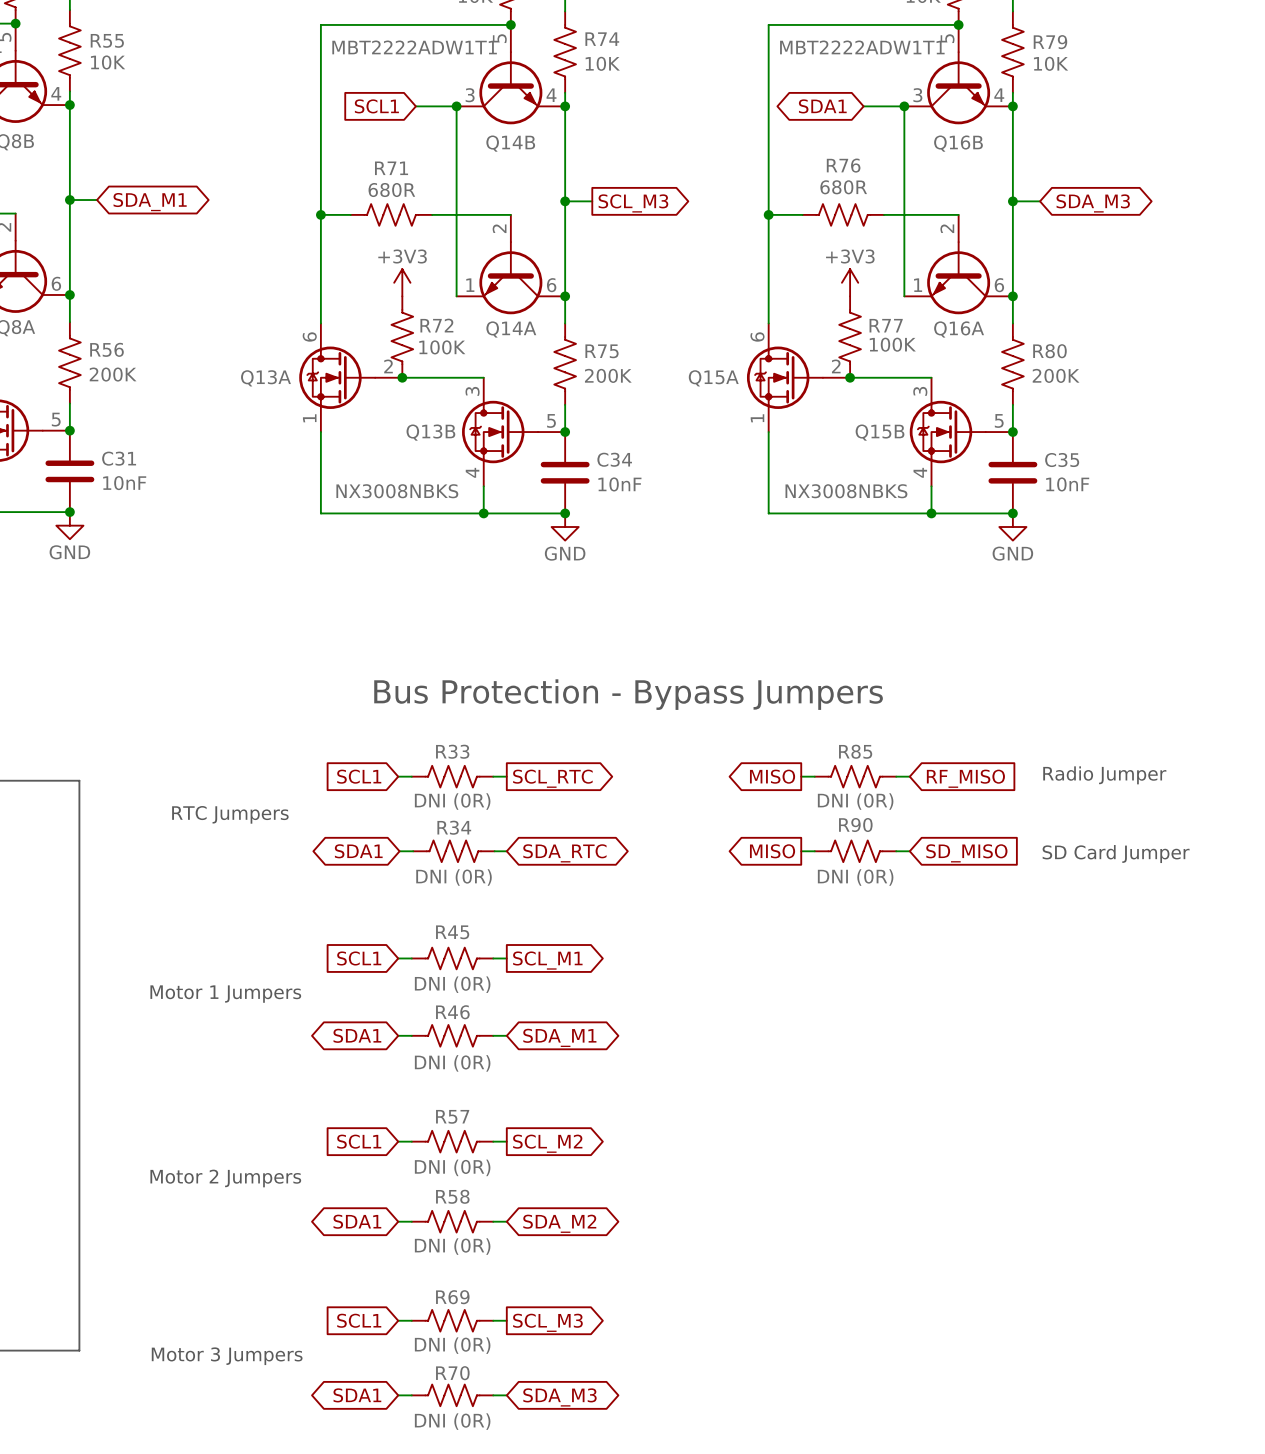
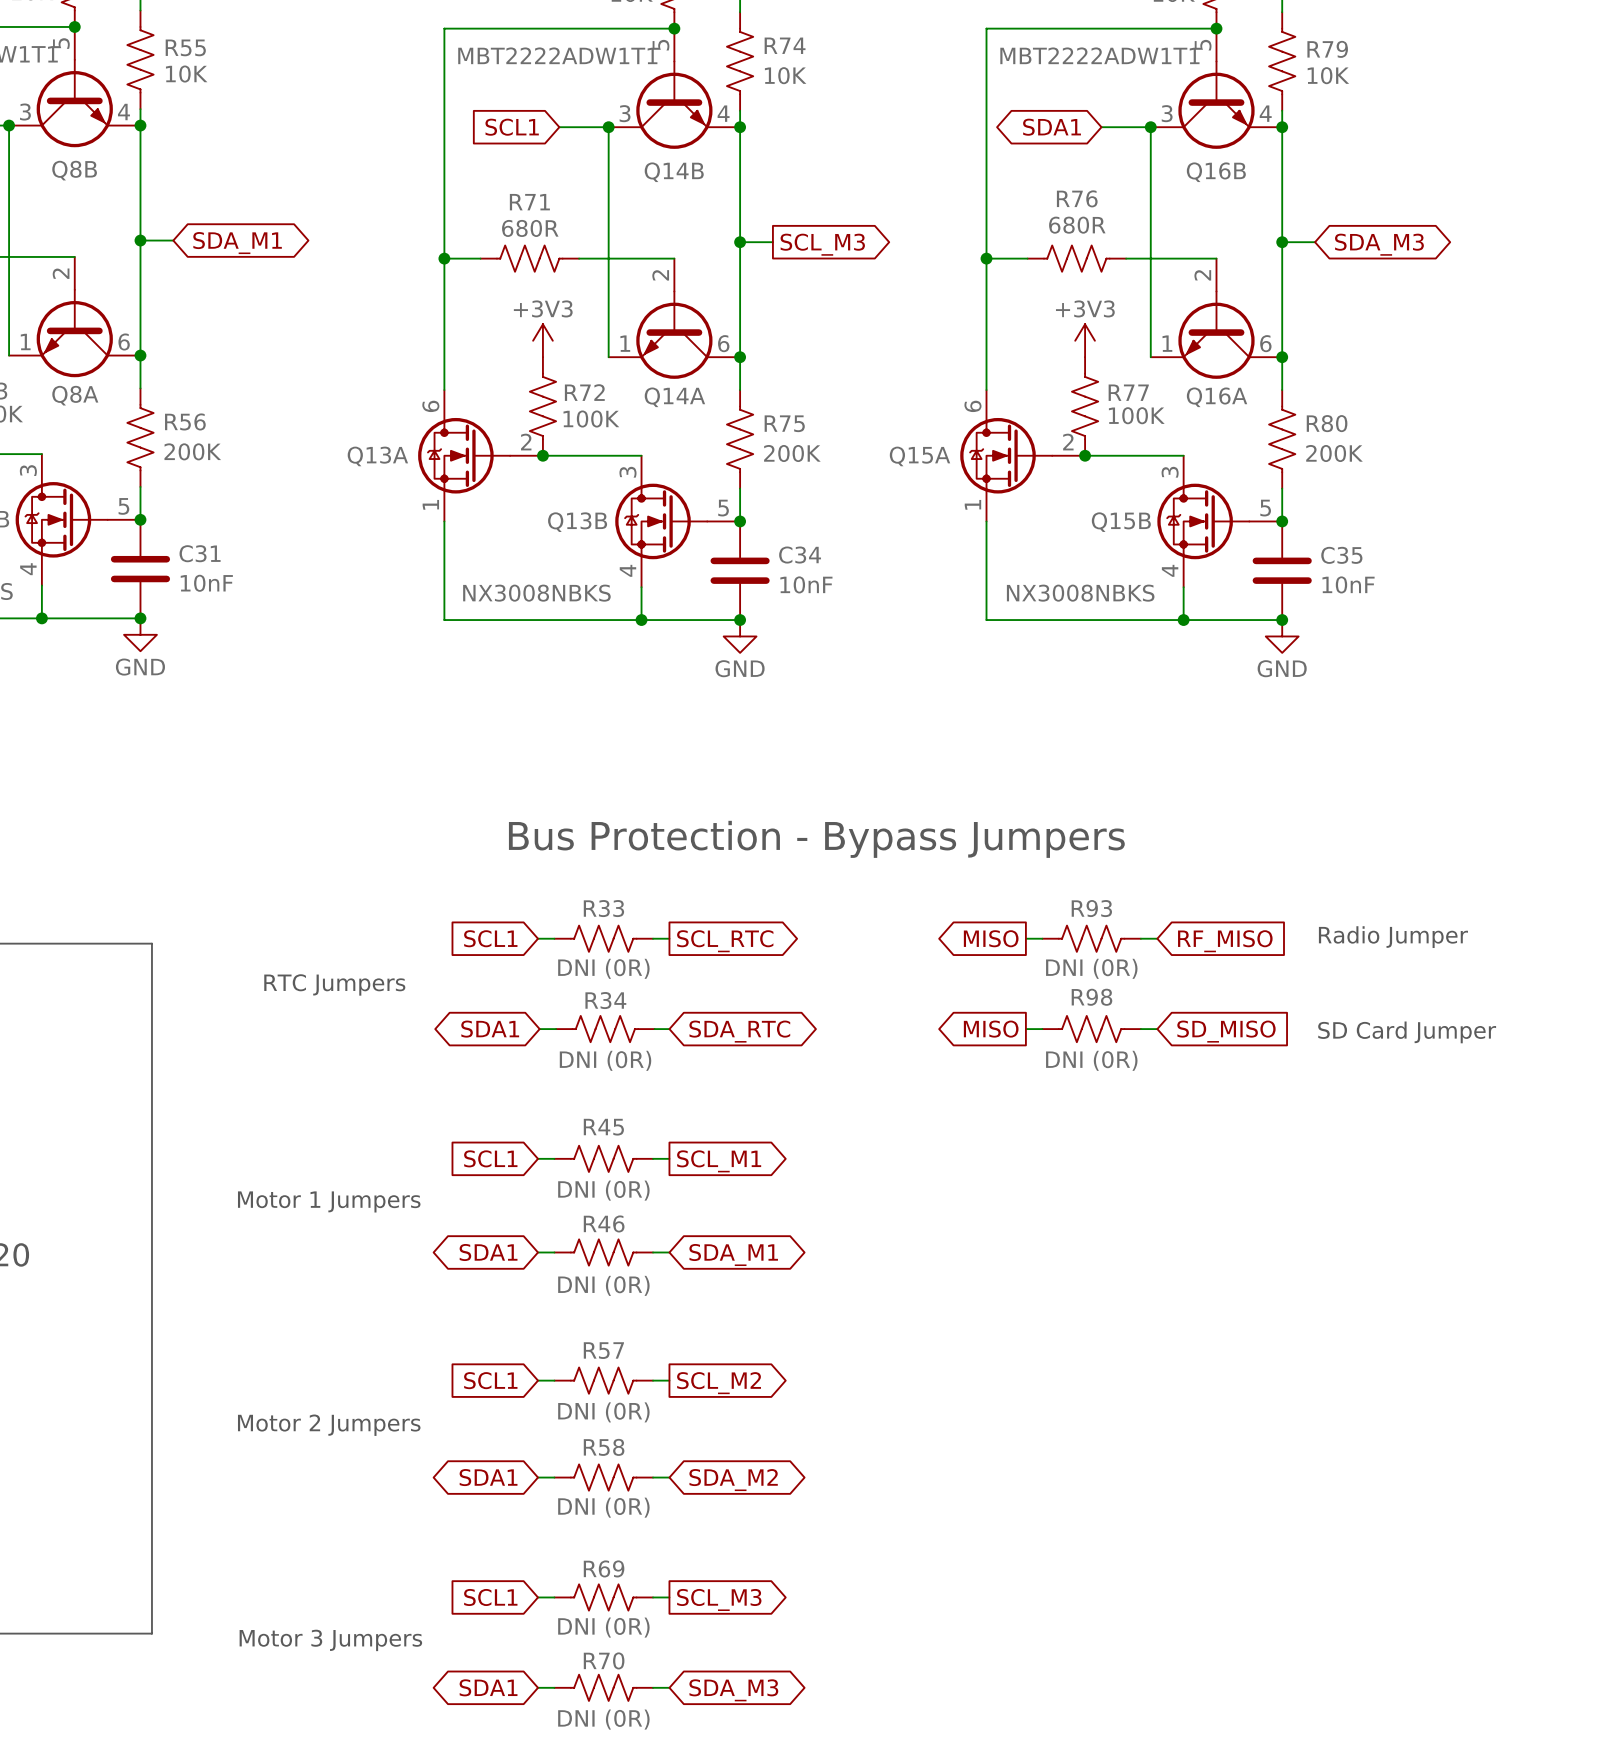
R85 name: R85 (855, 751) -> R93 (1091, 908)
R90 name: R90 (855, 825) -> R98 (1091, 997)

